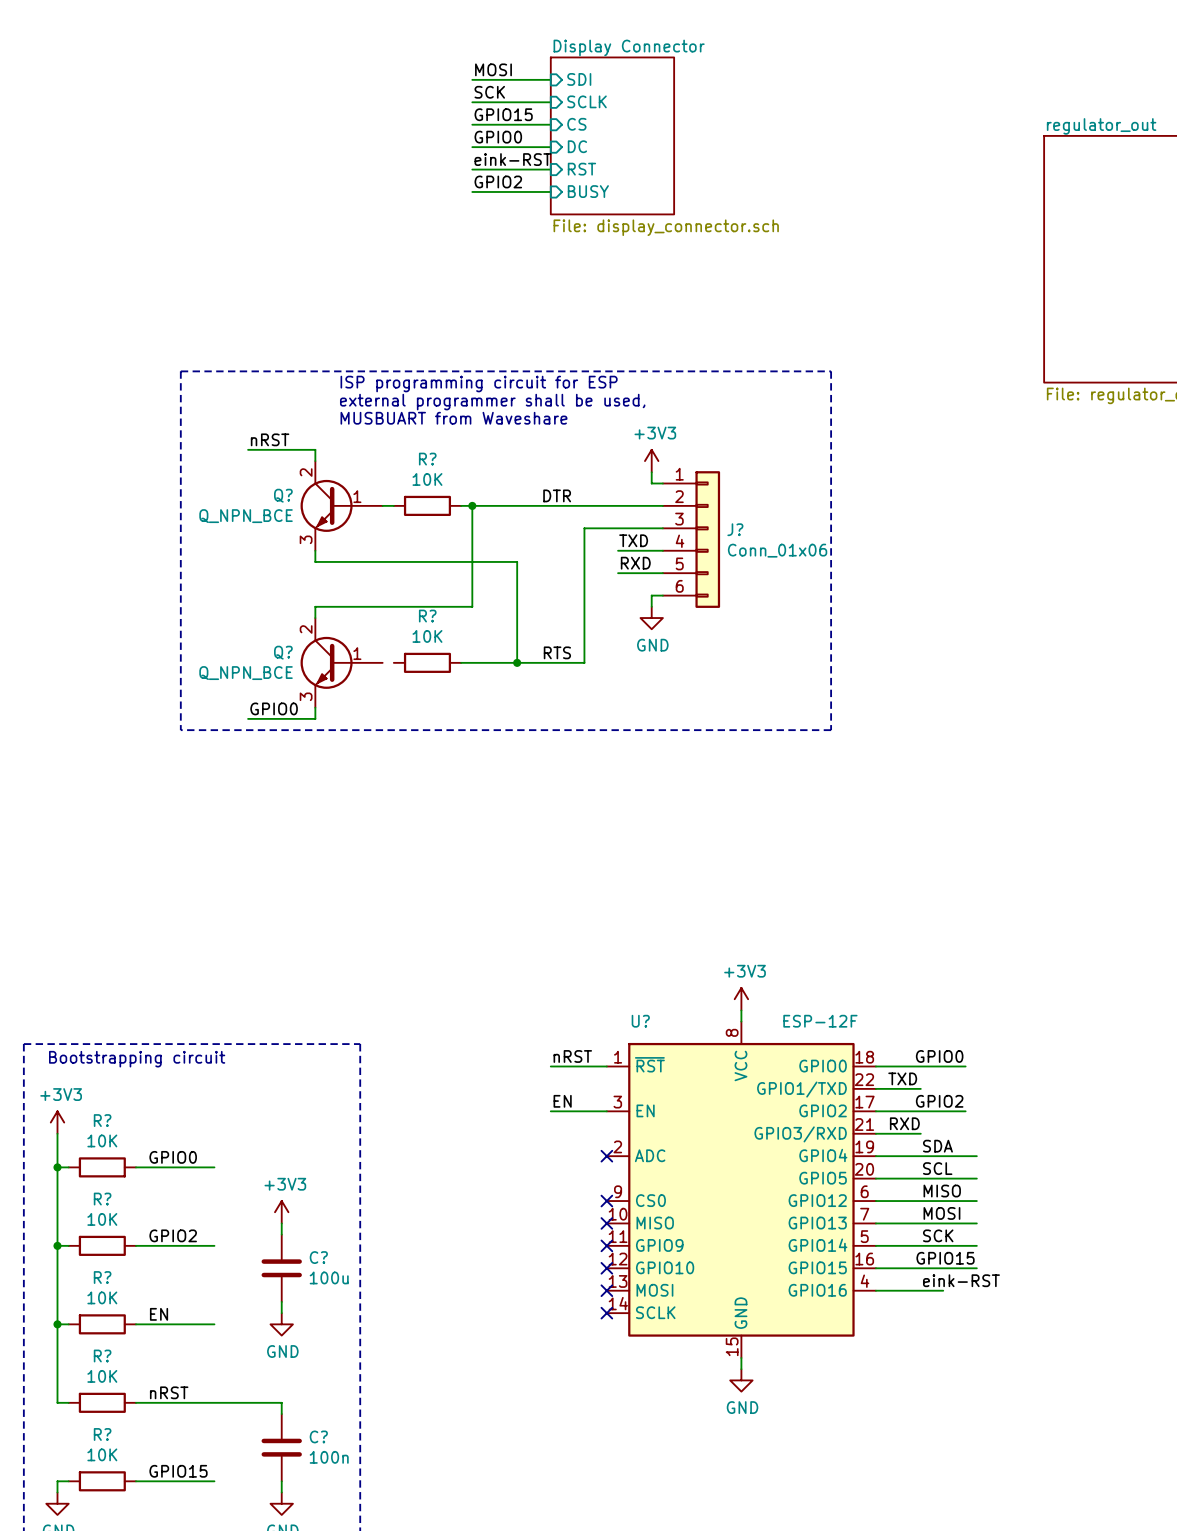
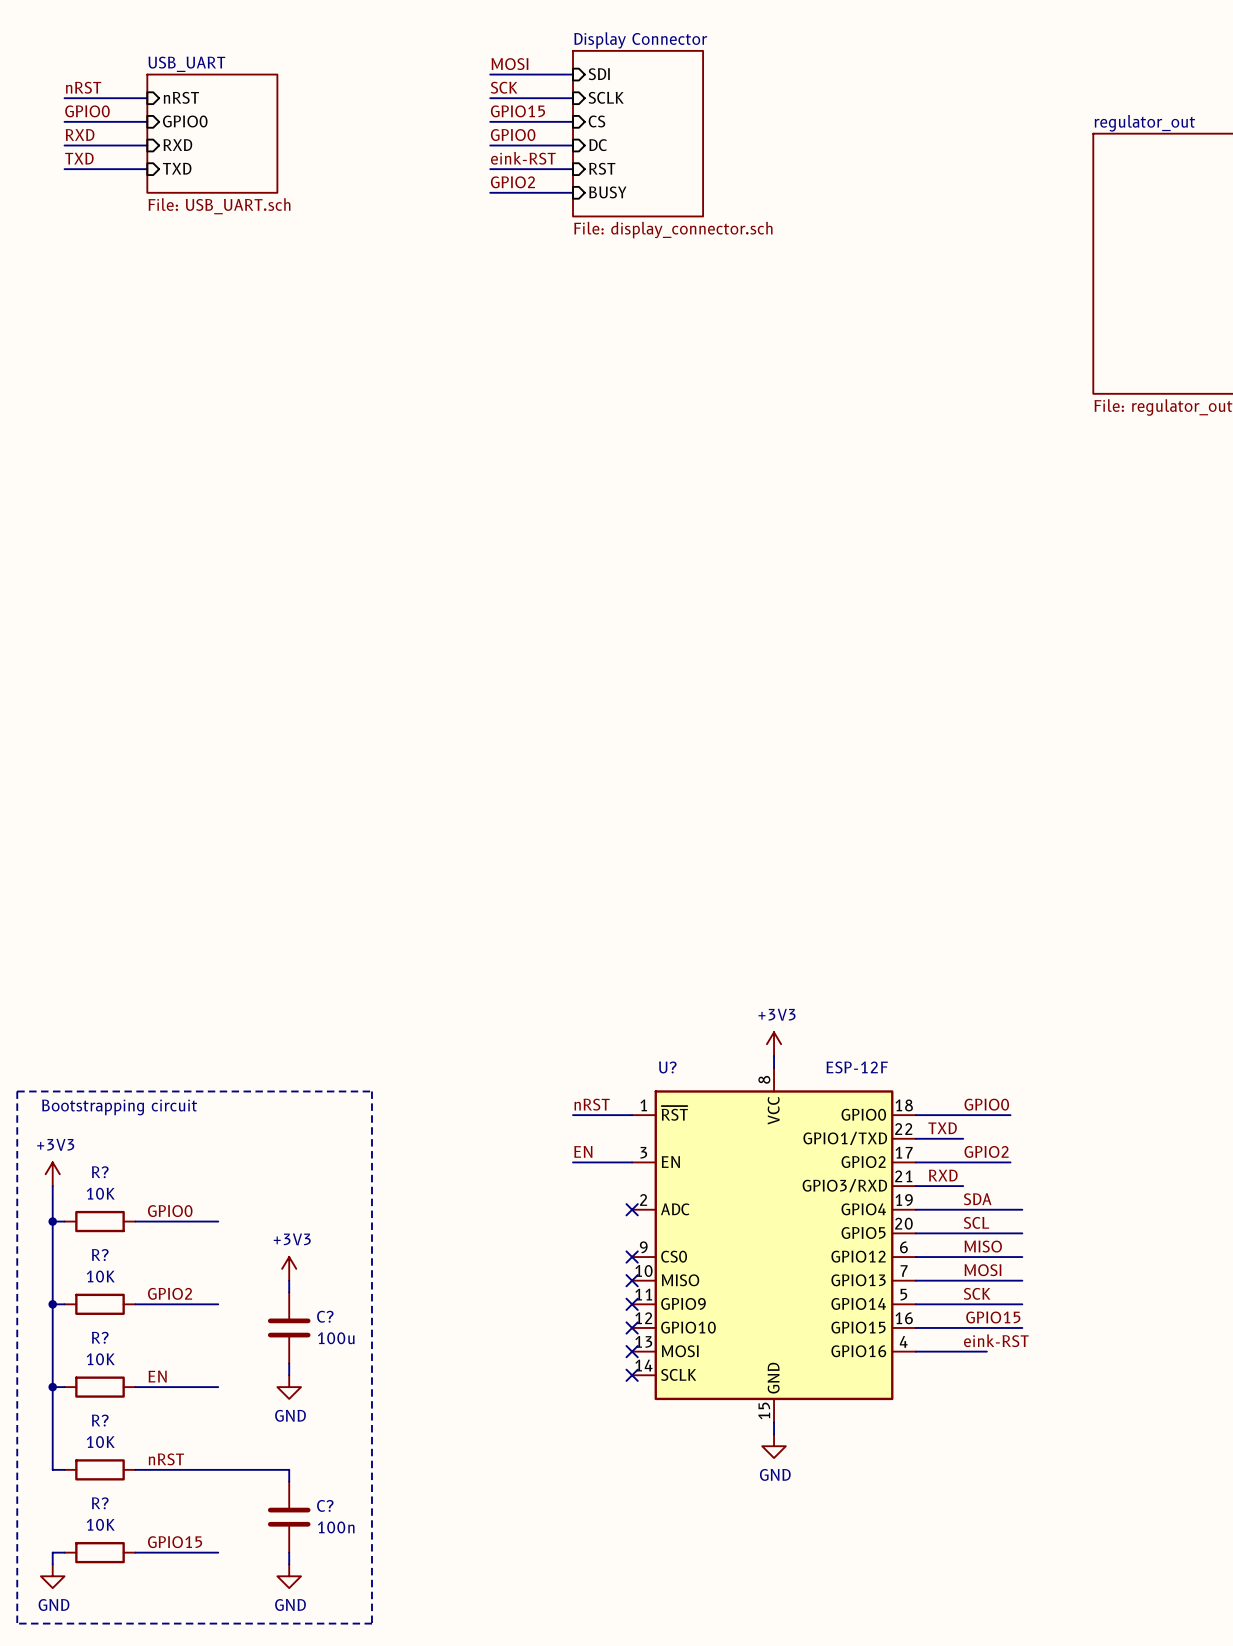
label: none -> nRST (83, 87)
sheet pin: none -> nRST (181, 97)
wire: none -> (64, 98) (147, 98)
label: none -> GPIO0 (87, 111)
wire: none -> (64, 121) (147, 121)
sheet pin: none -> GPIO0 (185, 121)
sheet USB_UART: none -> File: USB_UART.sch (212, 133)
label: none -> RXD (80, 134)
sheet pin: none -> RXD (177, 145)
wire: none -> (64, 145) (147, 145)
label: none -> TXD (79, 158)
wire: none -> (64, 169) (147, 169)
sheet pin: none -> TXD (177, 168)
line: (180, 371) (831, 371) (831, 730) (180, 730) (180, 371) -> none
text: ISP programming circuit for ESP (479, 384) -> none
text: external programmer shall be used, (492, 402) -> none
text: MUSBUART from Waveshare (453, 418) -> none
label: nRST (270, 439) -> none
wire: (248, 449) (315, 449) (315, 461) -> none
power symbol: +3V3 (651, 461) -> none
wire: (651, 472) (651, 483) (662, 483) -> none
label: DTR (557, 495) -> none
Q?: Q_NPN_BCE (341, 505) -> none
wire: (382, 505) (393, 505) -> none
R?: 10K (427, 505) -> none
wire: (461, 505) (662, 505) -> none
wire: (472, 505) (472, 606) (315, 606) (315, 618) -> none
junction: (472, 505) -> none
wire: (662, 528) (584, 528) (584, 662) (461, 662) -> none
J?: Conn_01x06 (691, 539) -> none
label: TXD (633, 540) -> none
wire: (315, 550) (315, 561) (517, 561) (517, 662) -> none
wire: (618, 550) (662, 550) -> none
label: RXD (635, 563) -> none
wire: (618, 573) (662, 573) -> none
wire: (662, 595) (651, 595) (651, 606) -> none
power symbol: GND (651, 618) -> none
label: RTS (557, 652) -> none
Q?: Q_NPN_BCE (341, 662) -> none
R?: 10K (427, 662) -> none
junction: (517, 662) -> none
wire: (315, 707) (315, 718) (248, 718) -> none
label: GPIO0 (274, 708) -> none

